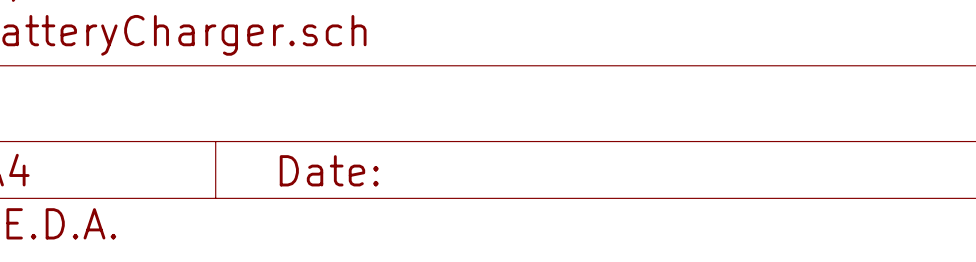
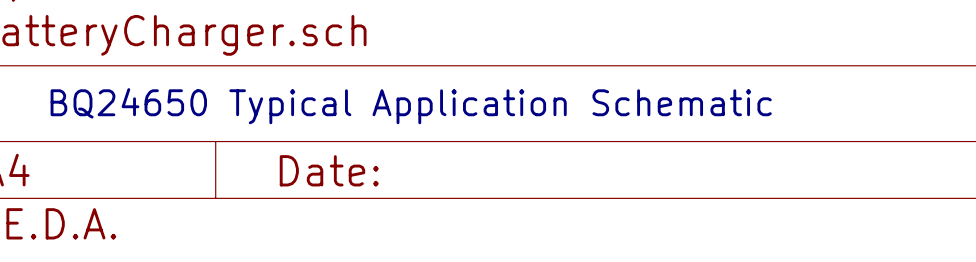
text: none -> BQ24650 Typical Application Schematic (411, 106)

